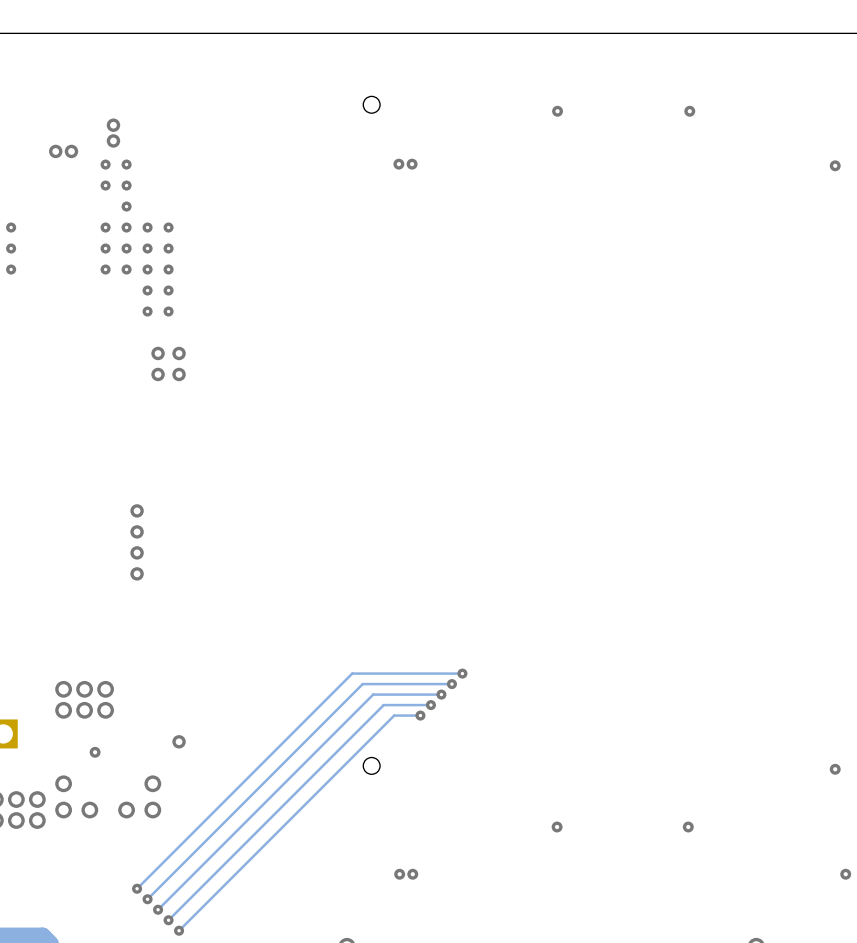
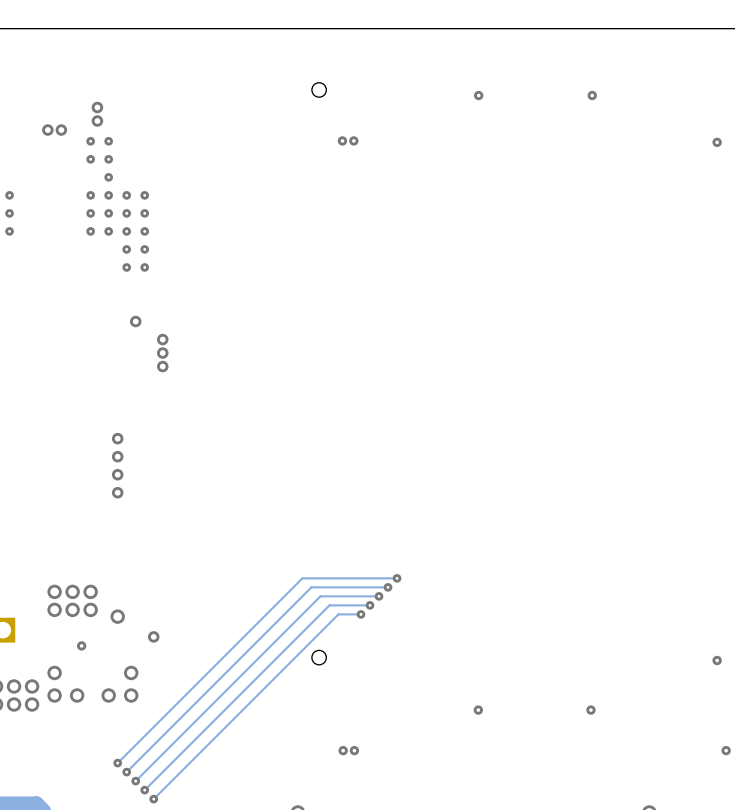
via: (158, 353) -> none
via: (179, 353) -> none
via: (179, 374) -> none
via: none -> (162, 339)
via: none -> (162, 353)
via: none -> (162, 366)
via: none -> (117, 616)

